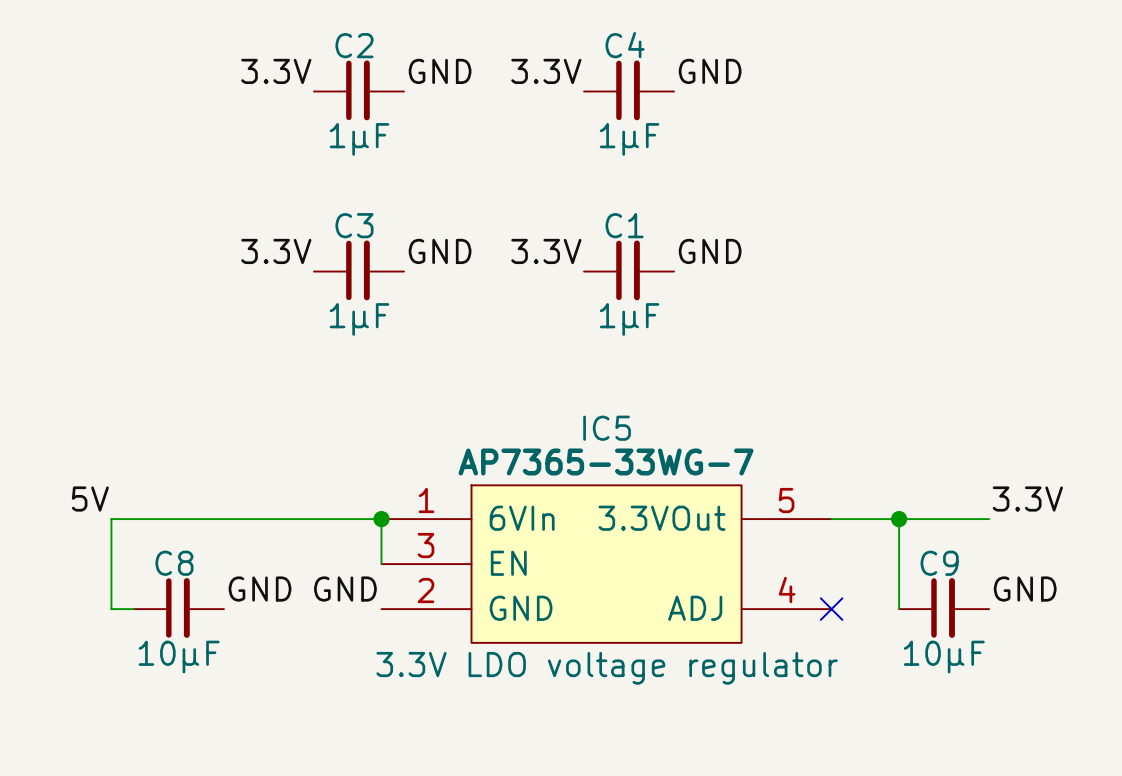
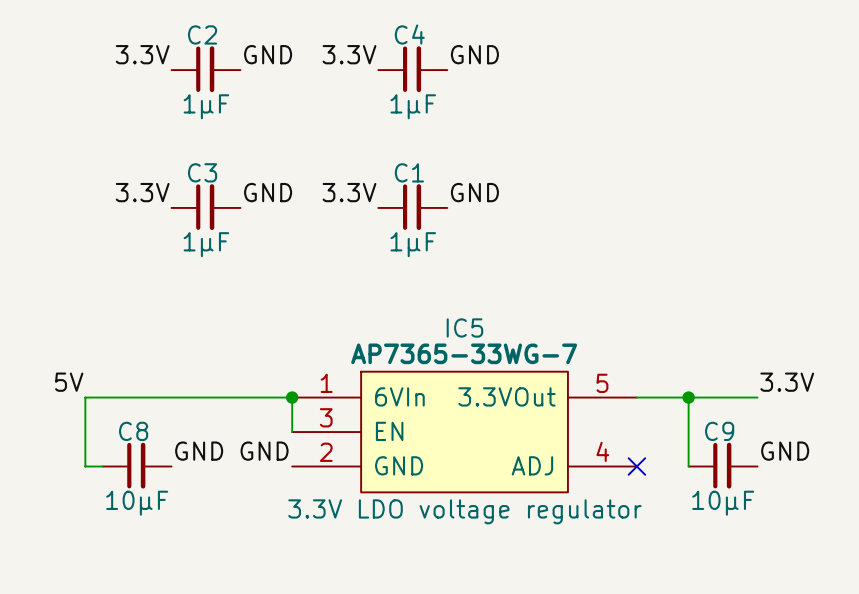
label: none -> 3.3V (142, 54)
label: 3.3V (276, 71) -> GND (268, 54)
label: GND (440, 71) -> none
label: none -> 3.3V (349, 54)
label: 3.3V (546, 71) -> GND (474, 54)
label: GND (710, 71) -> none
C2 position: (358, 90) -> (206, 69)
C4 position: (629, 90) -> (412, 69)
label: none -> 3.3V (142, 192)
label: 3.3V (276, 251) -> GND (268, 192)
label: GND (440, 251) -> none
label: none -> 3.3V (349, 192)
label: 3.3V (546, 251) -> GND (474, 192)
label: GND (710, 251) -> none
C3 position: (358, 270) -> (206, 207)
C1 position: (629, 270) -> (412, 207)

